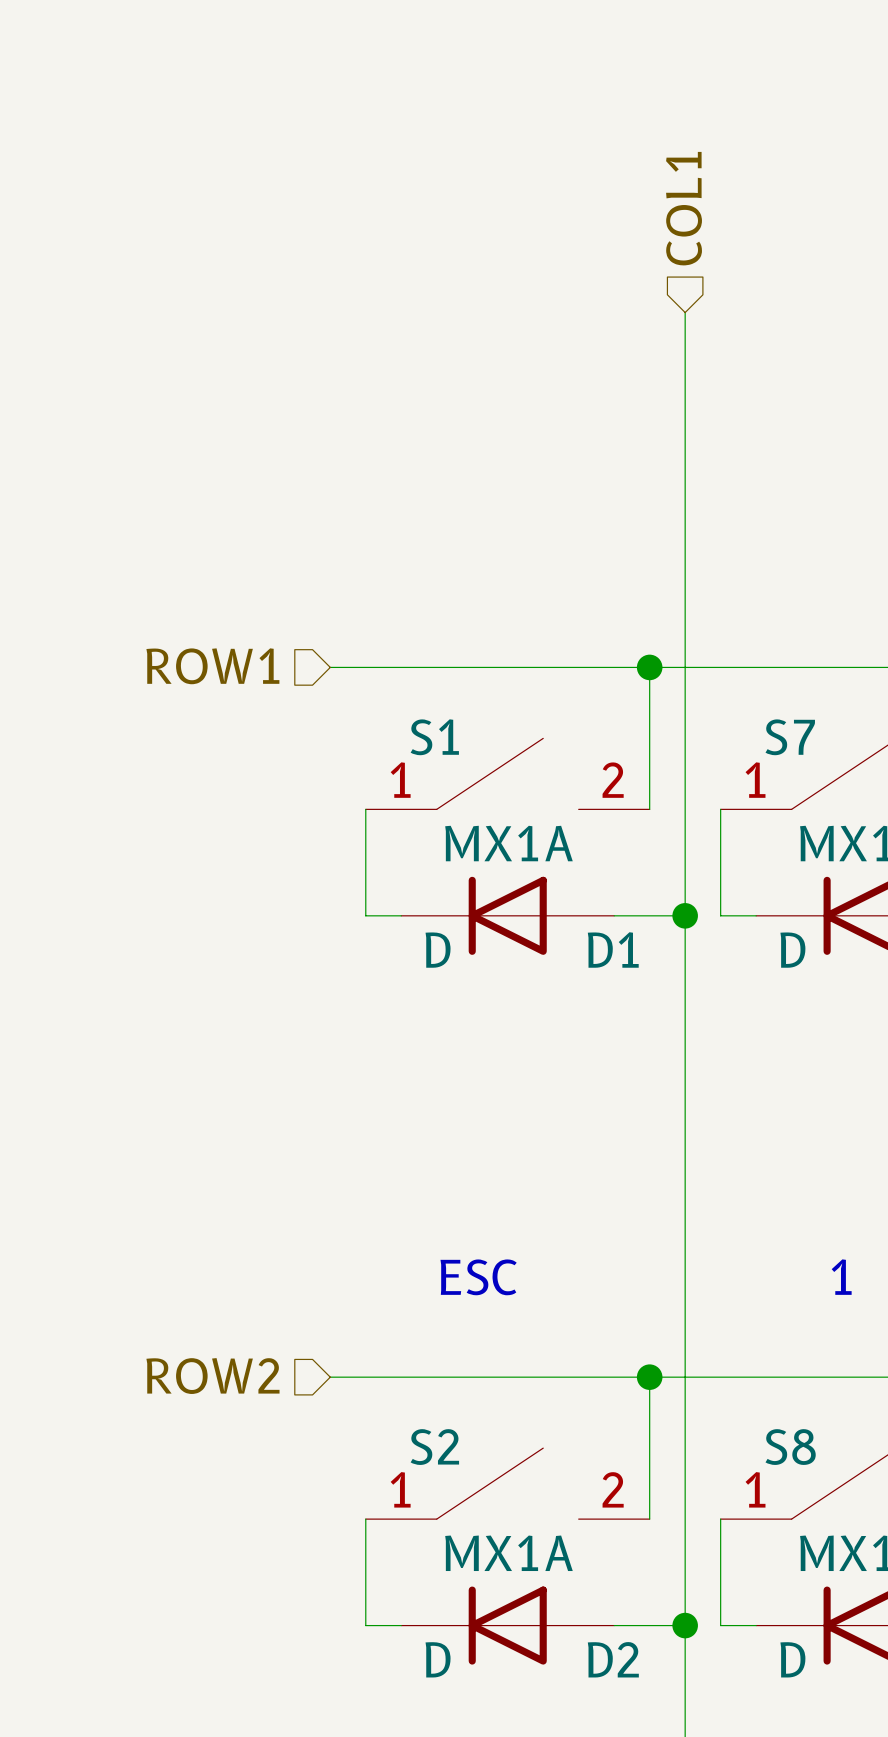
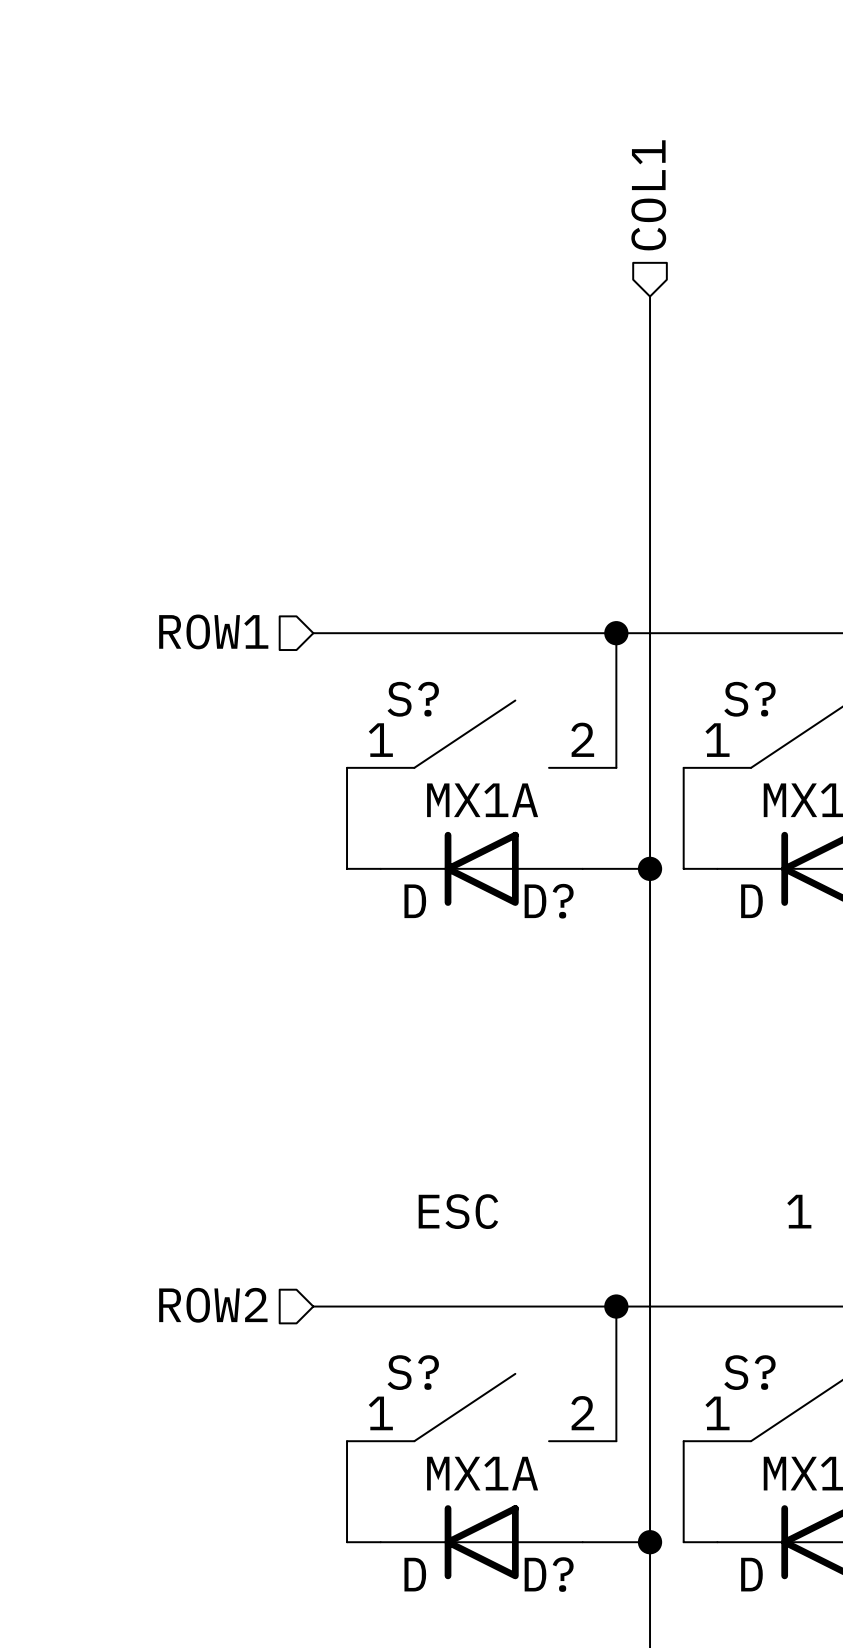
S1 name: S1 (434, 737) -> S? (413, 699)
S7 name: S7 (790, 737) -> S? (749, 699)
D1 name: D1 (613, 949) -> D? (549, 901)
S2 name: S2 (434, 1447) -> S? (413, 1372)
S8 name: S8 (790, 1447) -> S? (749, 1372)
D2 name: D2 (613, 1659) -> D? (549, 1574)

